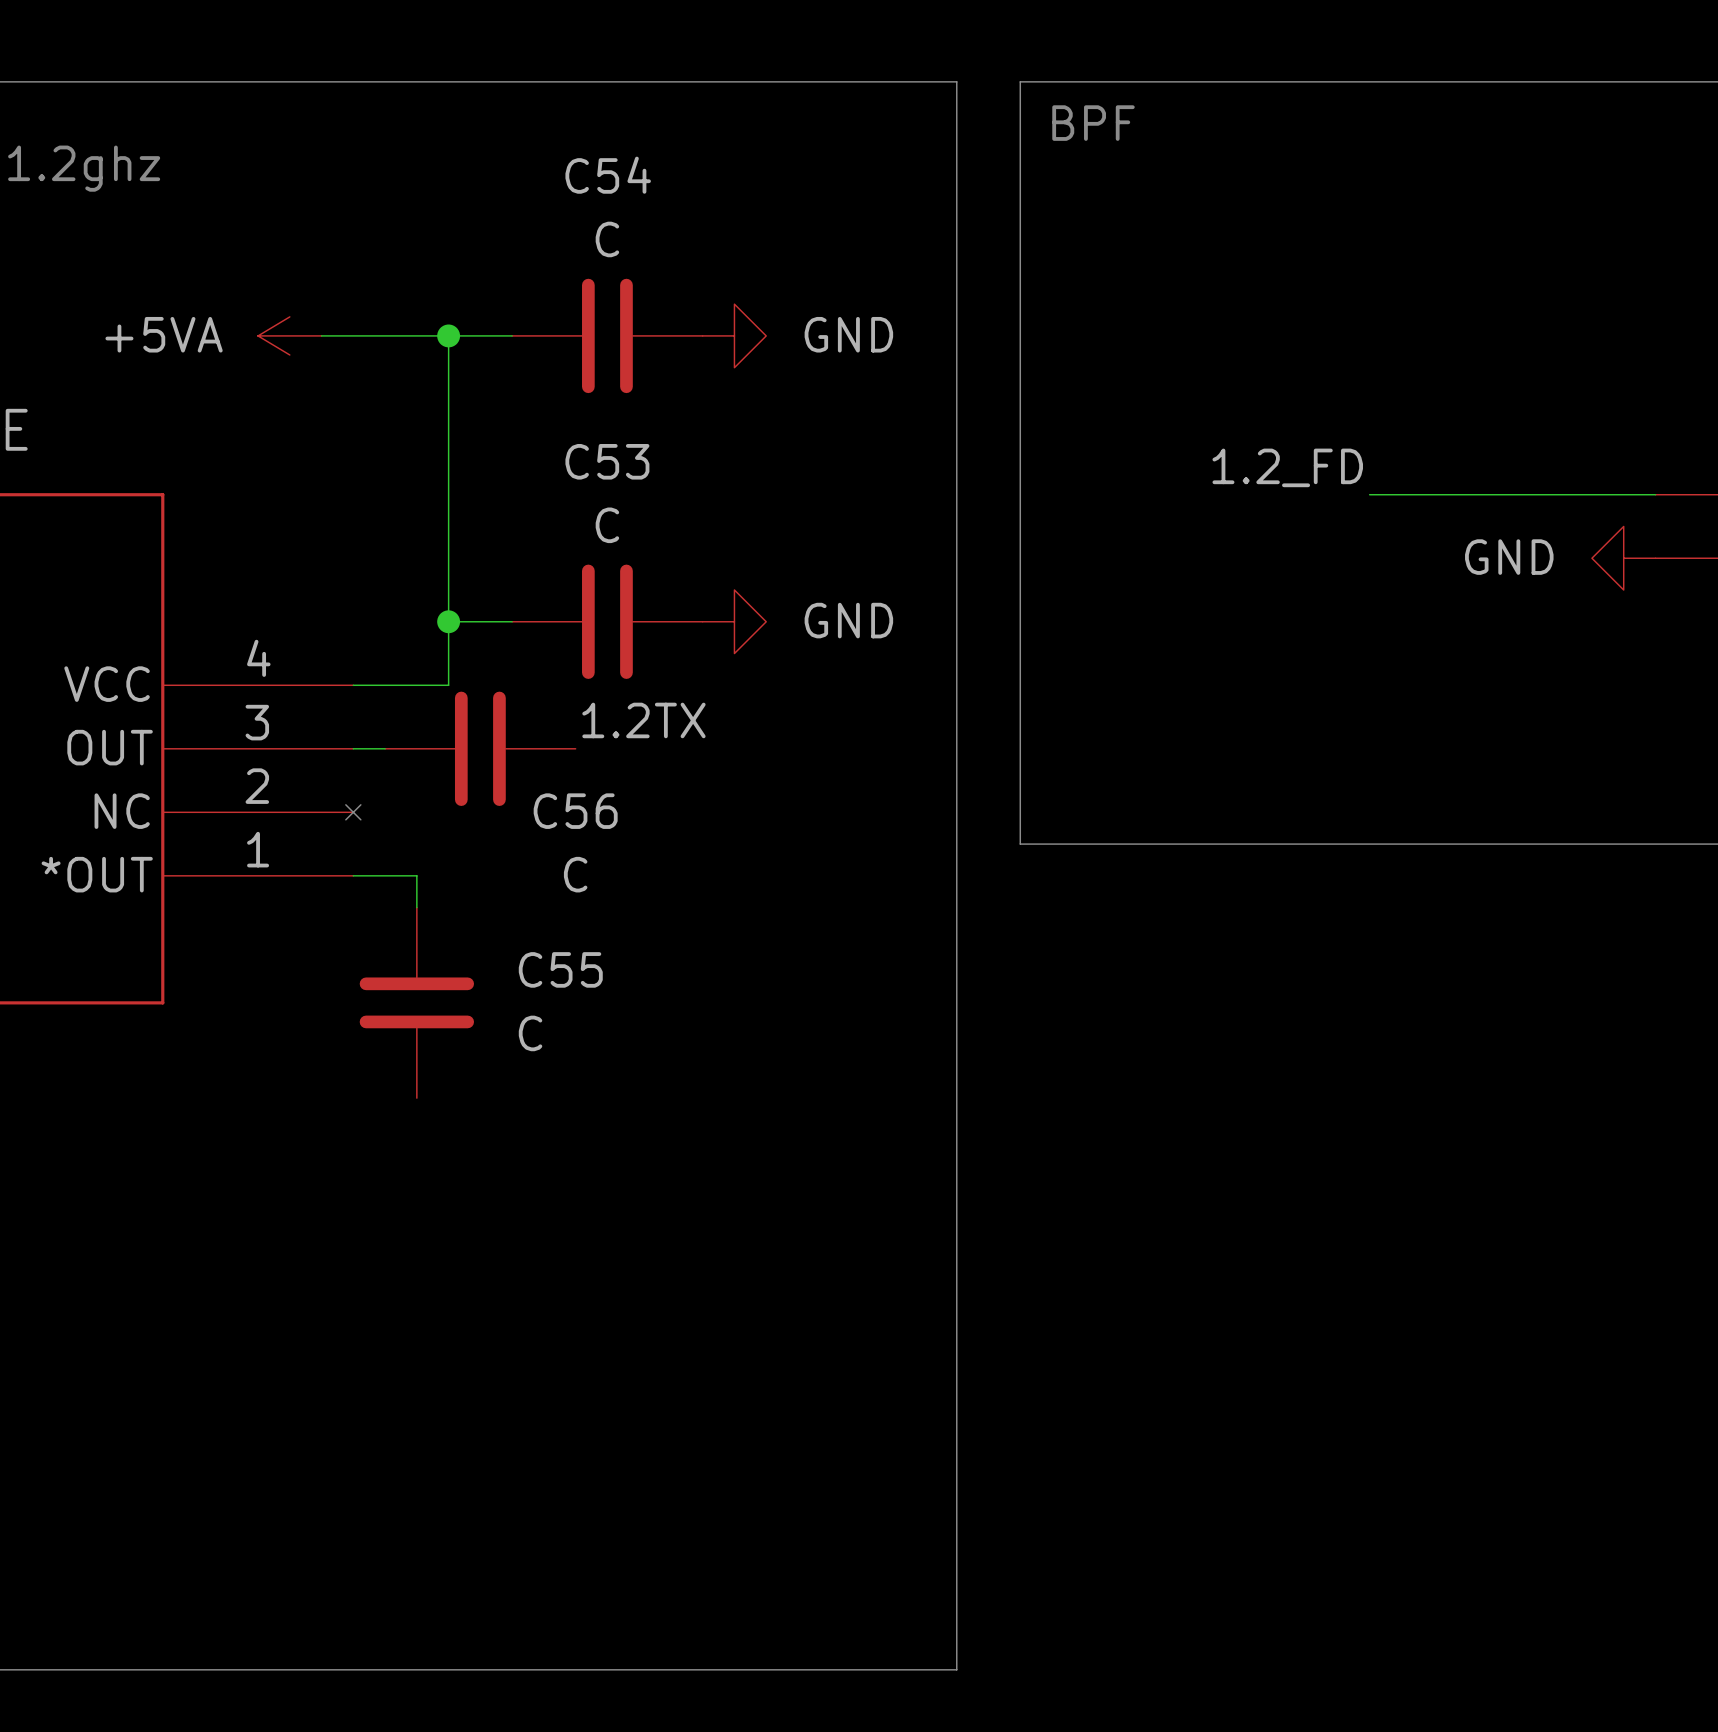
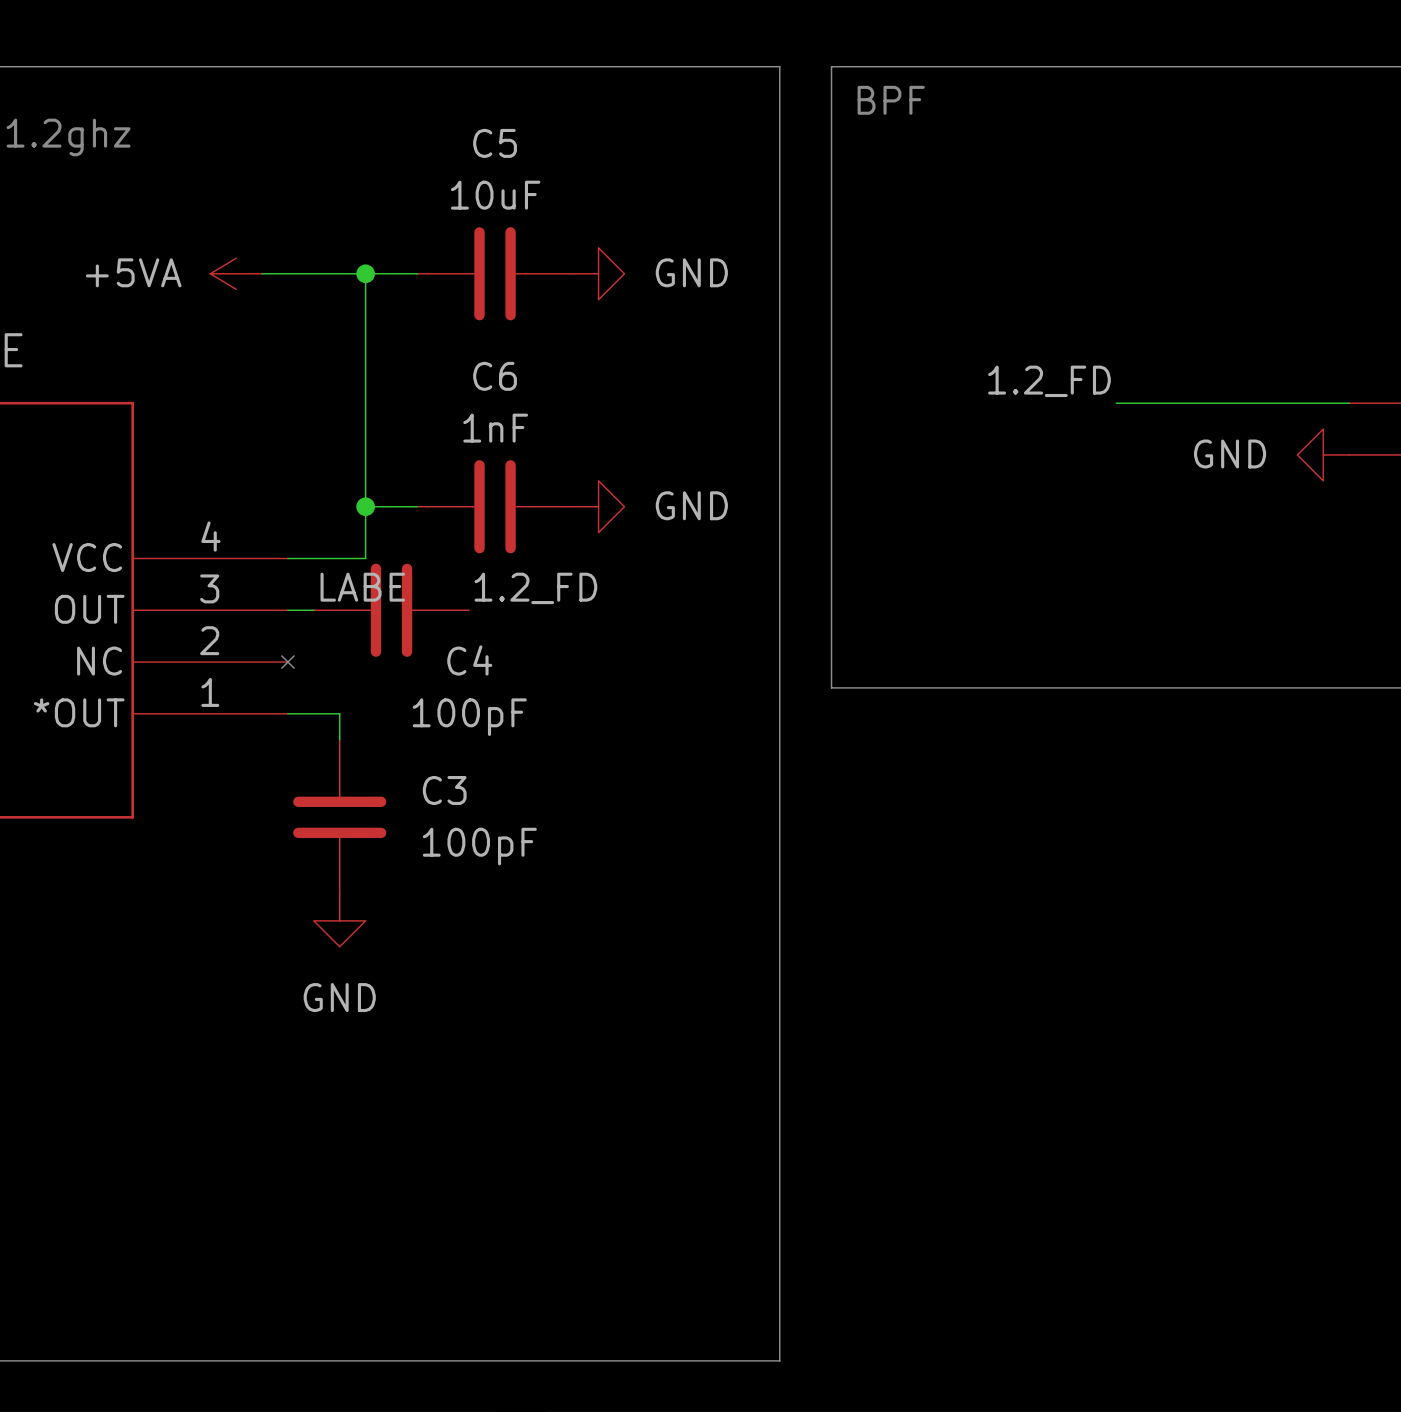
C54 name: C54 (608, 175) -> C5 (495, 143)
C54 value: C (607, 239) -> 10uF (495, 195)
C53 name: C53 (607, 461) -> C6 (495, 376)
C53 value: C (607, 525) -> 1nF (495, 428)
label: none -> LABE (362, 587)
label: 1.2TX (643, 720) -> 1.2_FD (535, 588)
C56 name: C56 (575, 811) -> C4 (469, 660)
C56 value: C (575, 874) -> 100pF (469, 717)
C55 name: C55 (560, 969) -> C3 (444, 790)
C55 value: C (530, 1033) -> 100pF (479, 846)
power symbol: none -> GND (339, 920)

